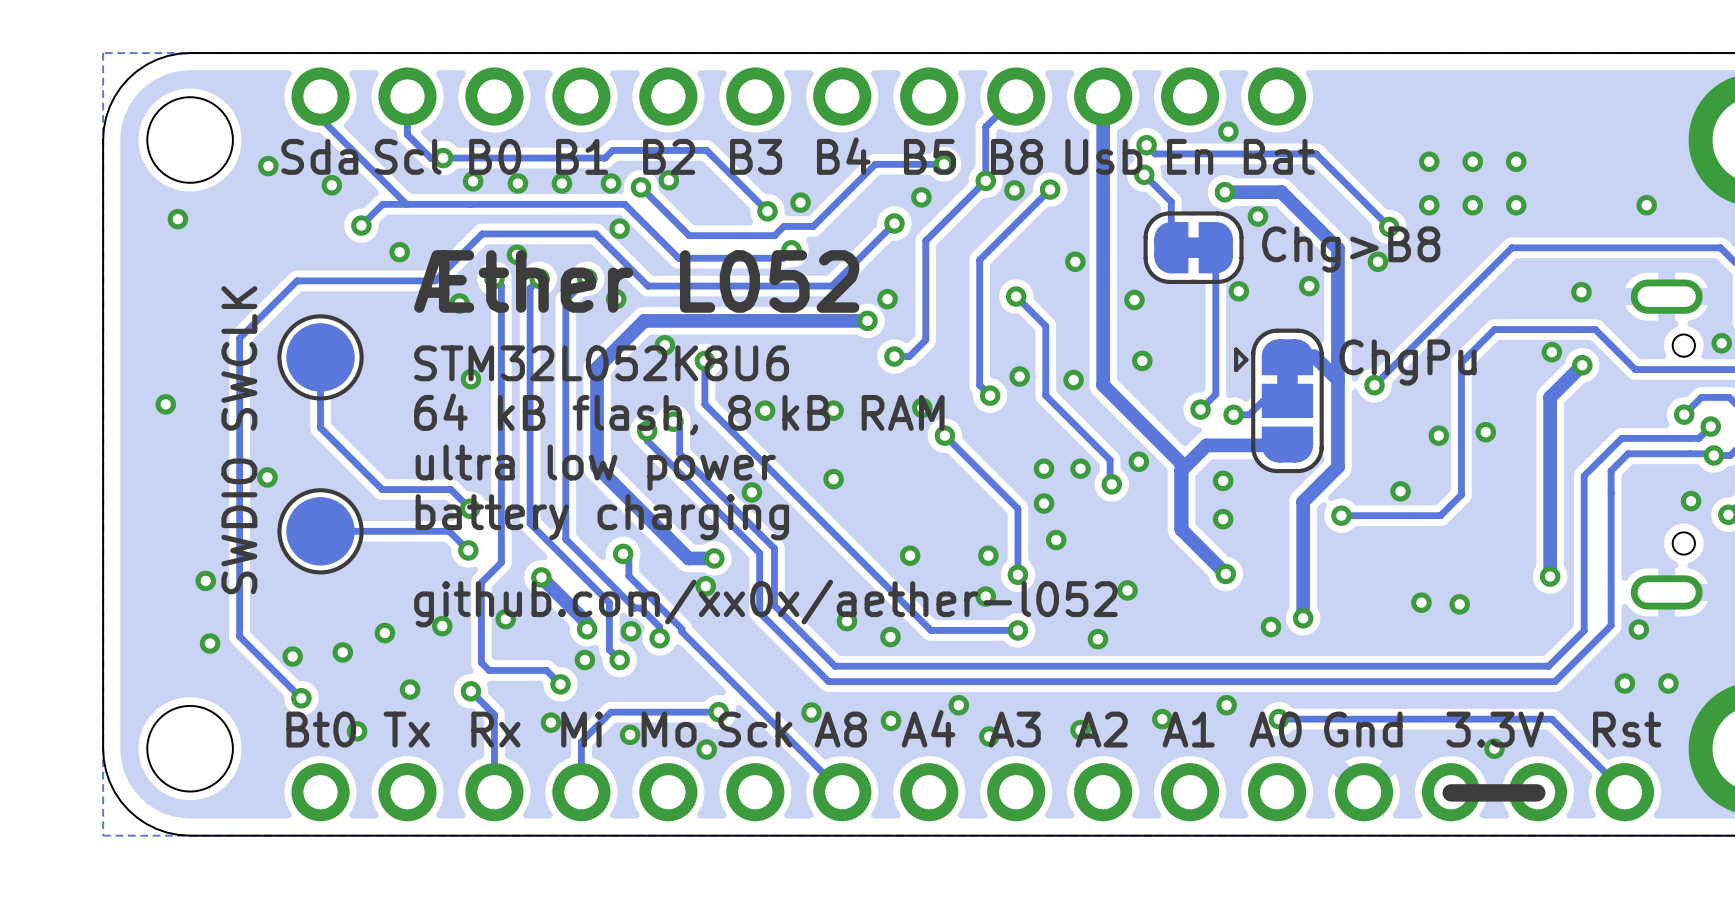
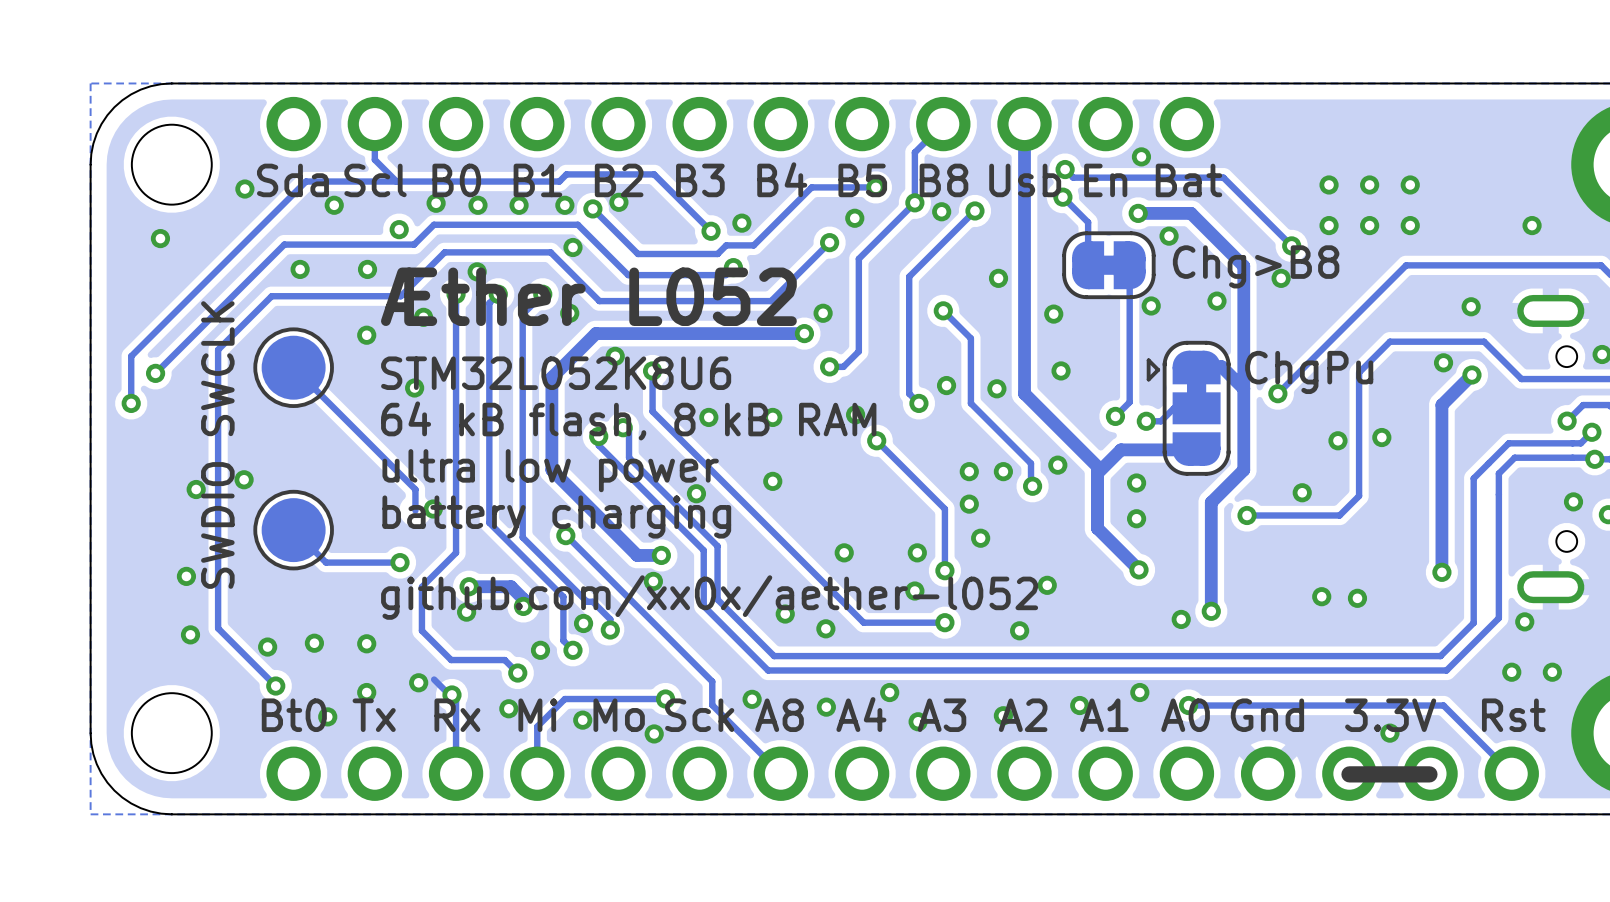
track: (320, 96) (320, 118) (406, 204) -> none
track: none -> (396, 181) (306, 181) (131, 356) (131, 403)
via: (443, 158) -> none
via: none -> (334, 205)
via: (331, 185) -> none
track: (470, 204) (382, 204) (361, 225) -> (433, 224) (414, 244) (284, 244) (155, 373) (159, 373)
via: none -> (399, 229)
via: (361, 225) -> none
via: none -> (300, 269)
track: (494, 278) (501, 285) (501, 562) (481, 582) (481, 662) -> (456, 294) (456, 552) (421, 586) (421, 630) (443, 652)
via: none -> (366, 335)
track: (320, 357) (320, 427) (382, 489) (450, 489) (470, 508) -> (293, 367) (415, 489) (415, 510)
via: none -> (155, 373)
via position: (470, 379) -> (414, 387)
via position: (165, 404) -> (131, 403)
via: none -> (196, 489)
track: (320, 531) (449, 531) (468, 550) -> (293, 530) (326, 562) (400, 562)
via: (468, 550) -> none
track: (623, 553) (628, 559) (628, 576) (768, 718) -> (566, 535) (712, 681) (712, 705)
via position: (623, 553) -> (565, 535)
via: none -> (400, 562)
track: (541, 577) (587, 623) (587, 629) -> none
via: (541, 577) -> none
track: none -> (469, 586) (511, 586) (523, 599) (523, 606)
via: none -> (469, 586)
via: (442, 626) -> none
via position: (587, 629) -> (523, 606)
via position: (384, 633) -> (366, 643)
via position: (410, 689) -> (366, 692)
via: (470, 691) -> none
via: none -> (418, 682)
via: none -> (451, 694)

